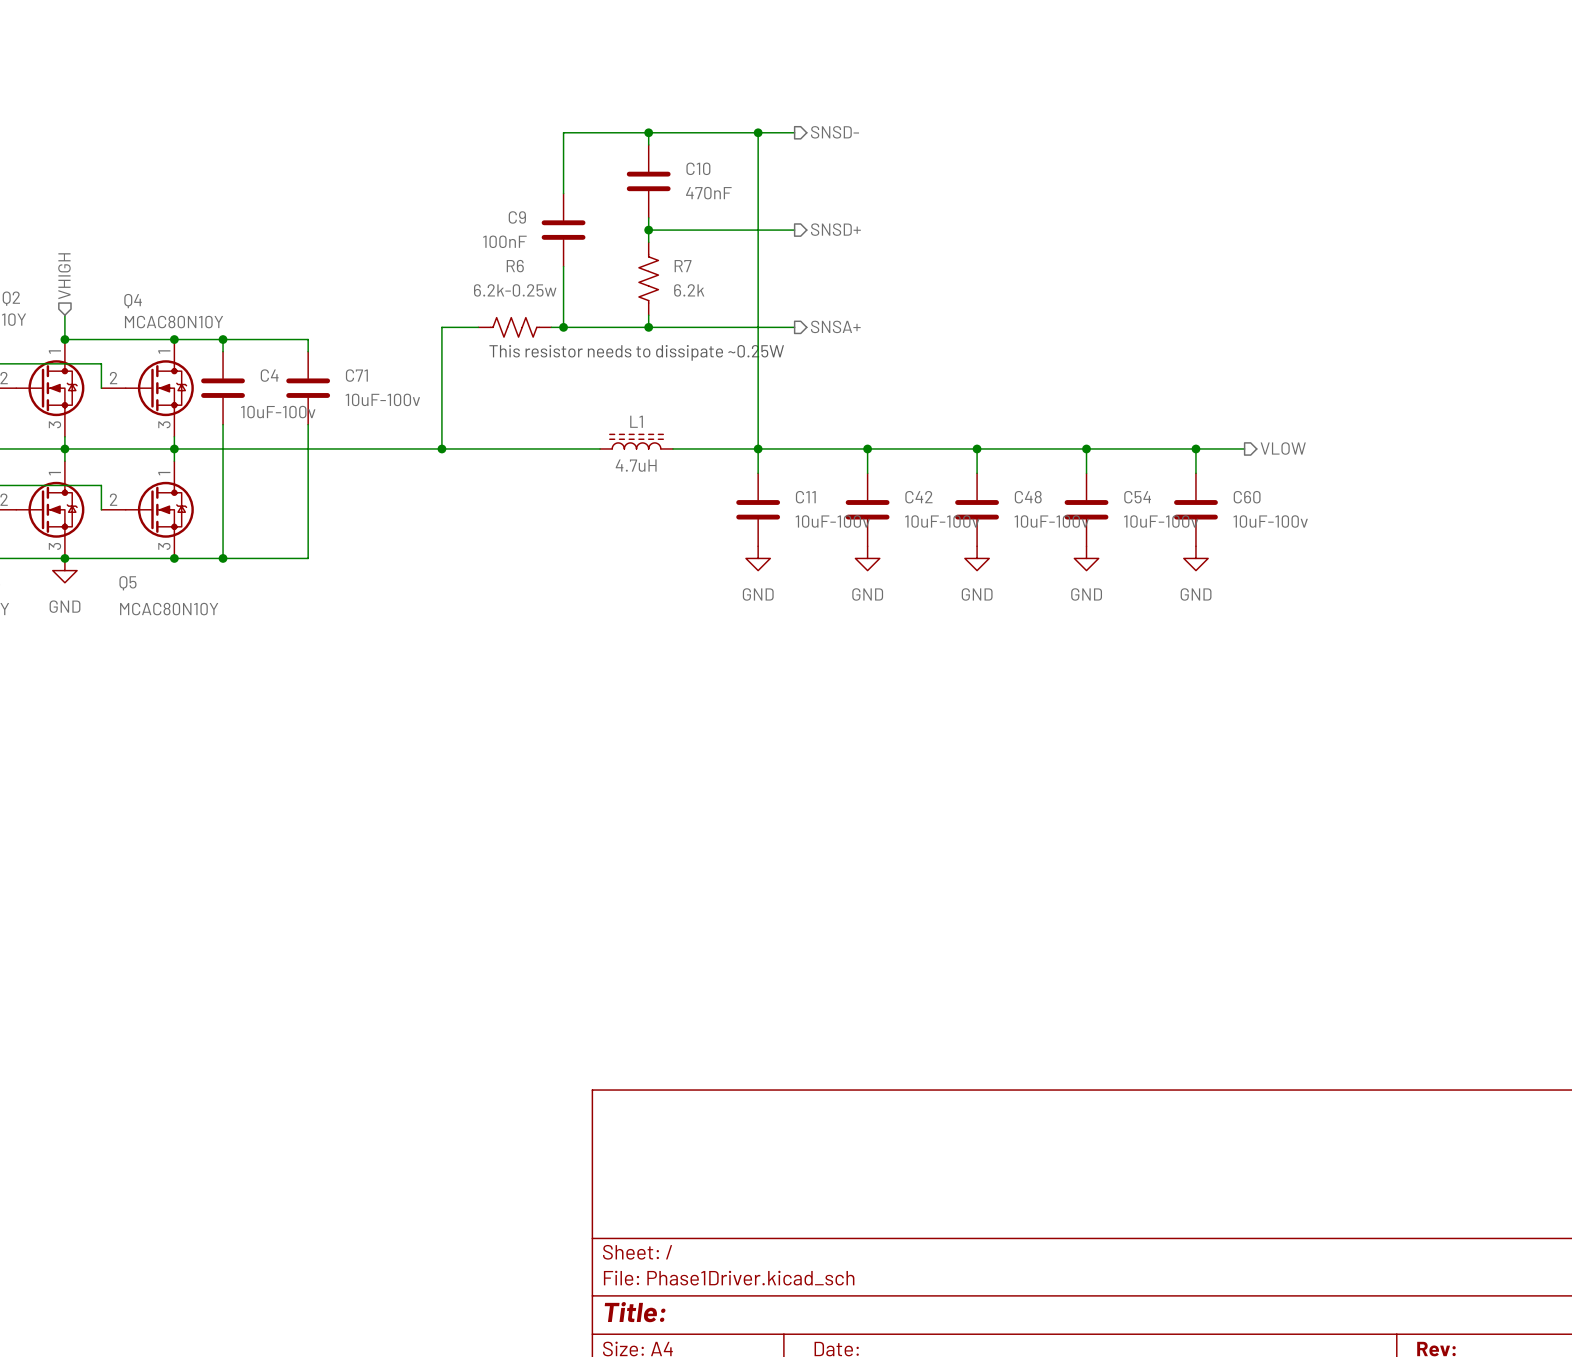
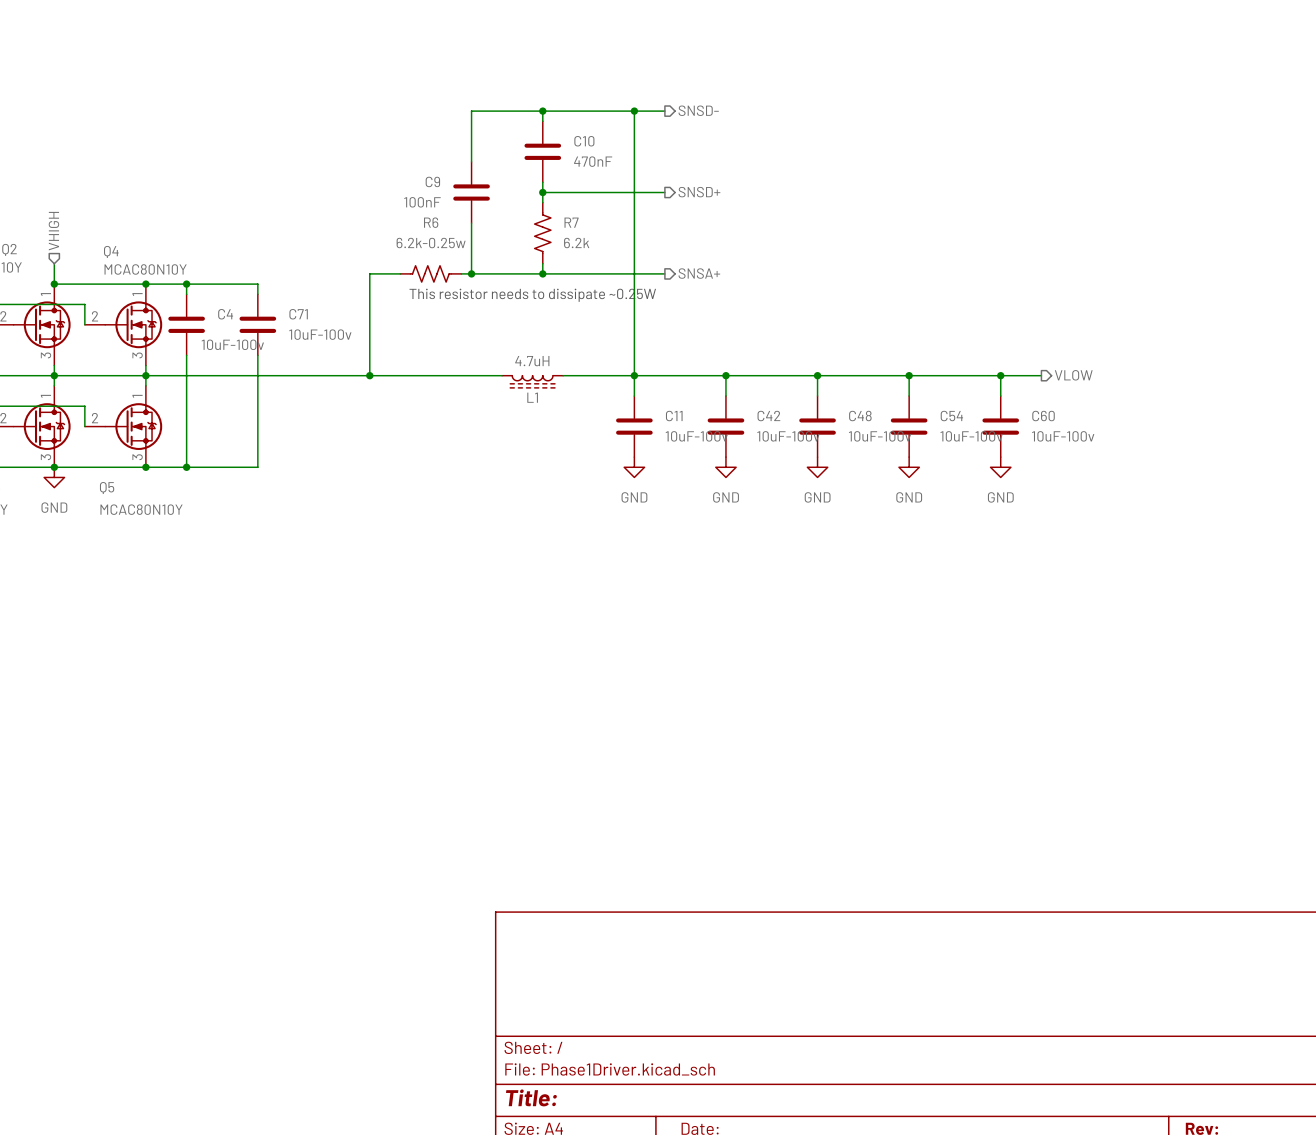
L1 rotation: 0° (636, 441) -> 180° (532, 381)

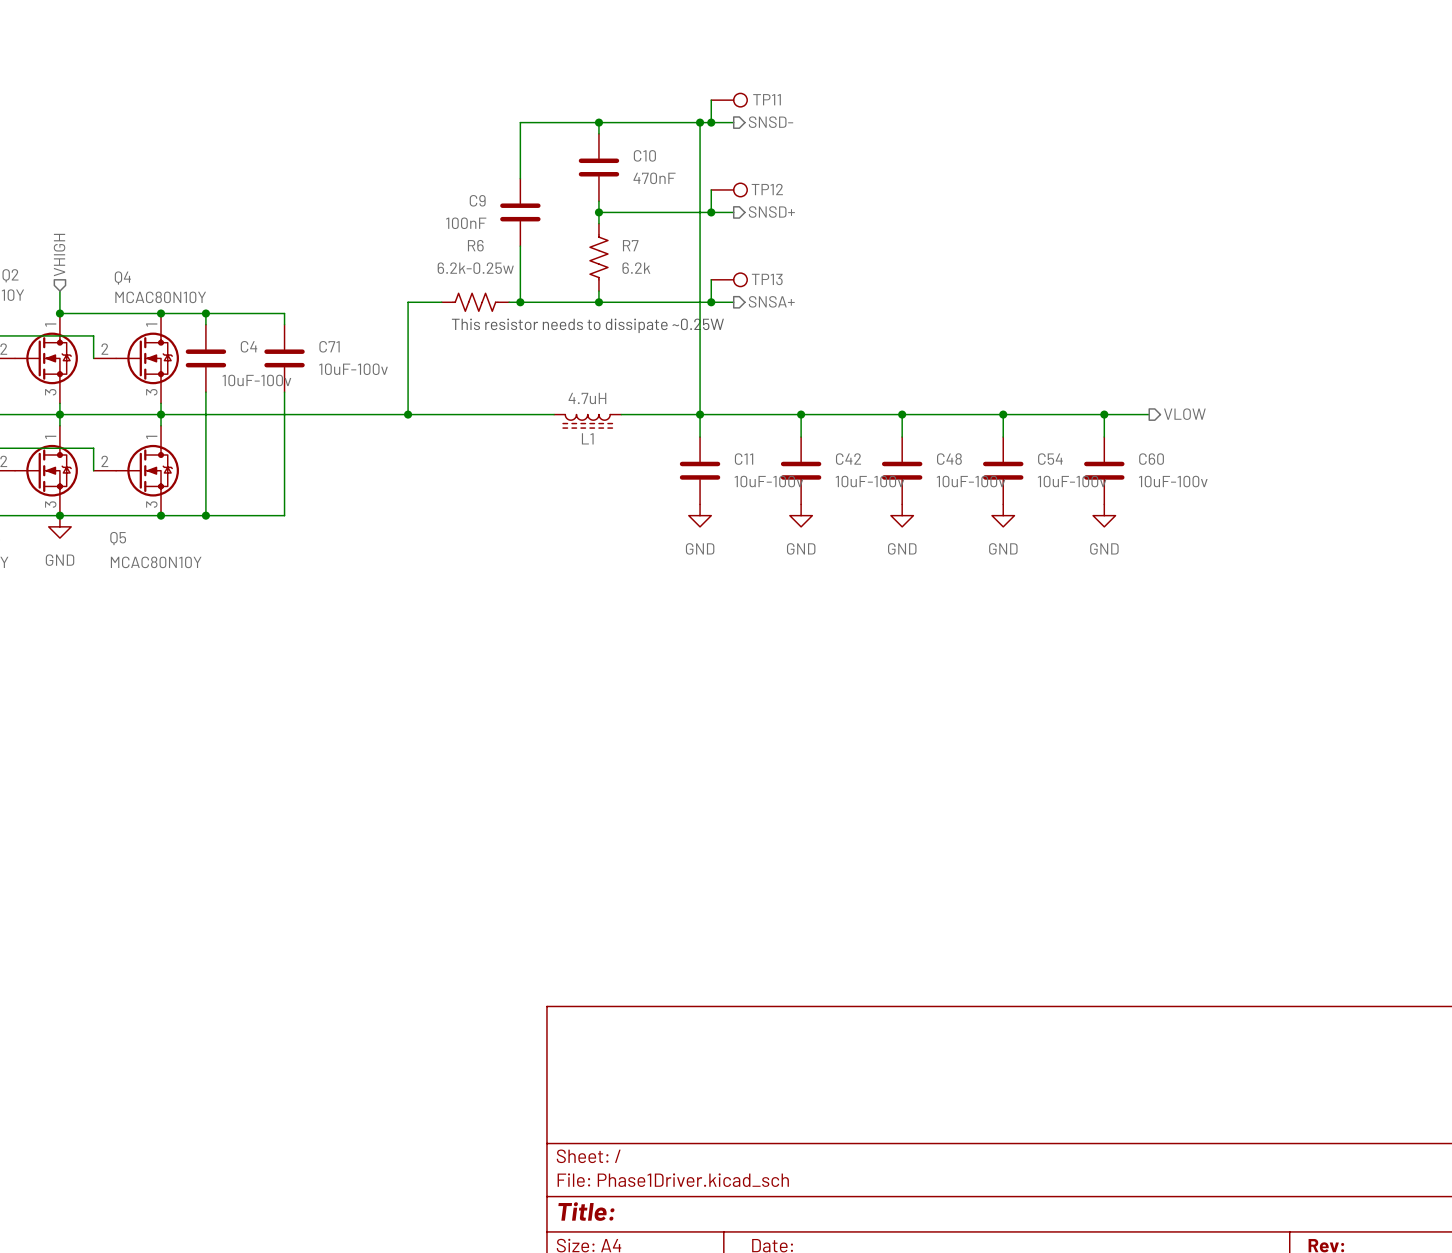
wire: none -> (711, 100) (711, 122)
TP11: none -> (729, 100)
junction: none -> (711, 122)
wire: none -> (711, 189) (711, 212)
TP12: none -> (729, 189)
junction: none -> (711, 212)
wire: none -> (711, 279) (711, 302)
TP13: none -> (729, 279)
junction: none -> (711, 302)

